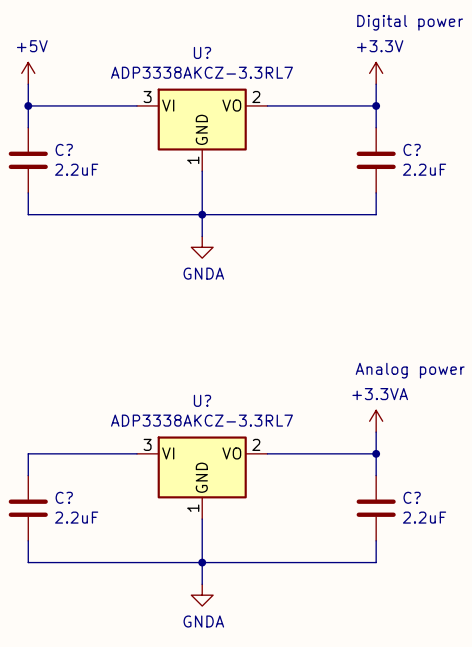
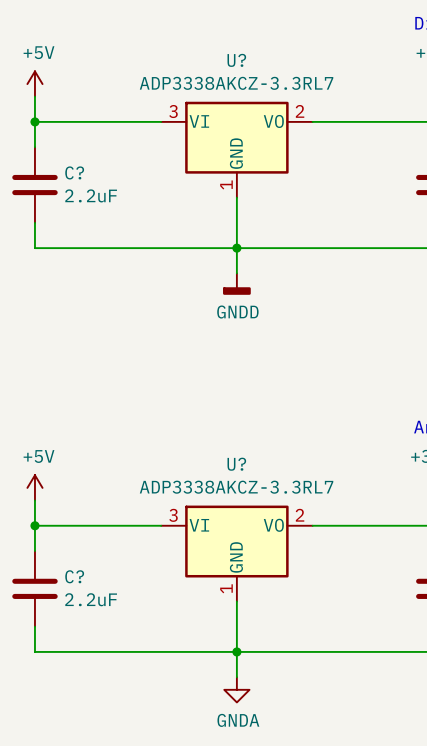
power symbol: GNDA (202, 247) -> GNDD (236, 284)
power symbol: none -> +5V (34, 487)
wire: none -> (34, 500) (34, 525)
junction: none -> (34, 525)

